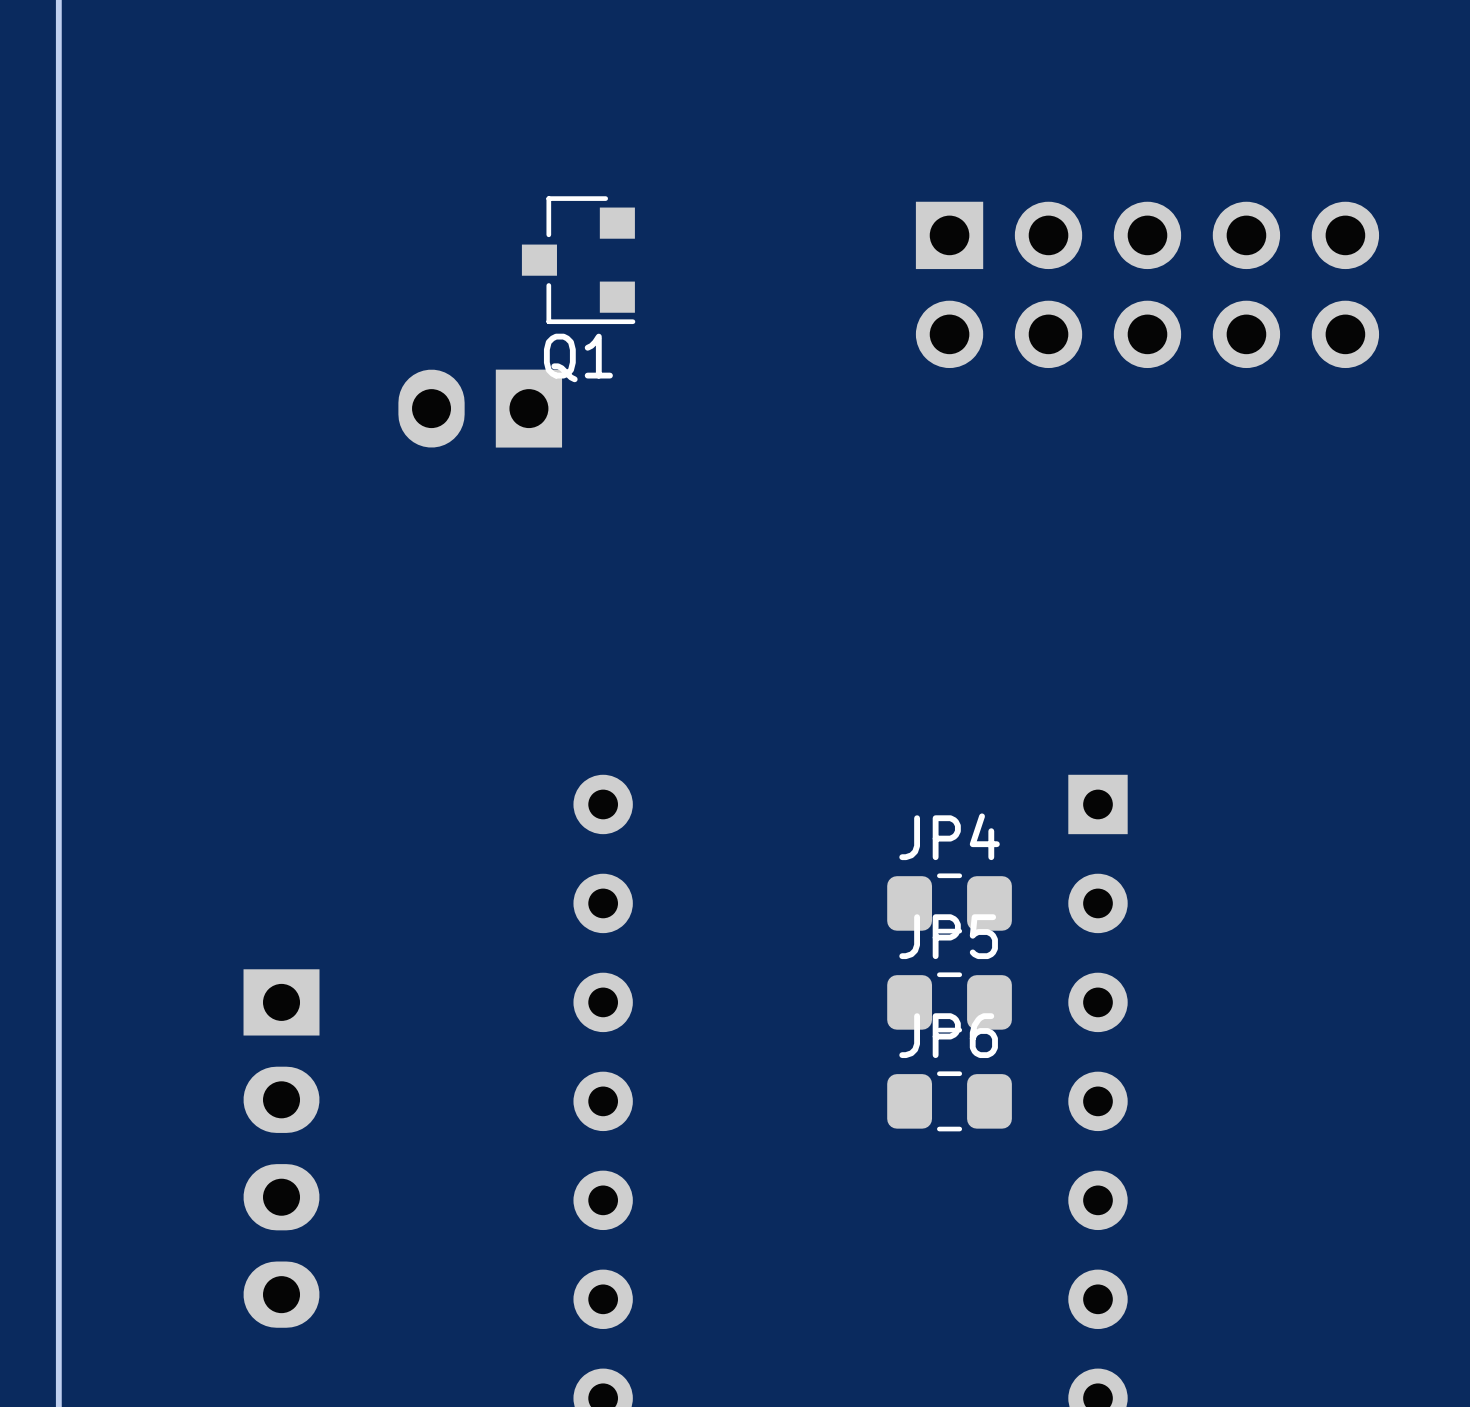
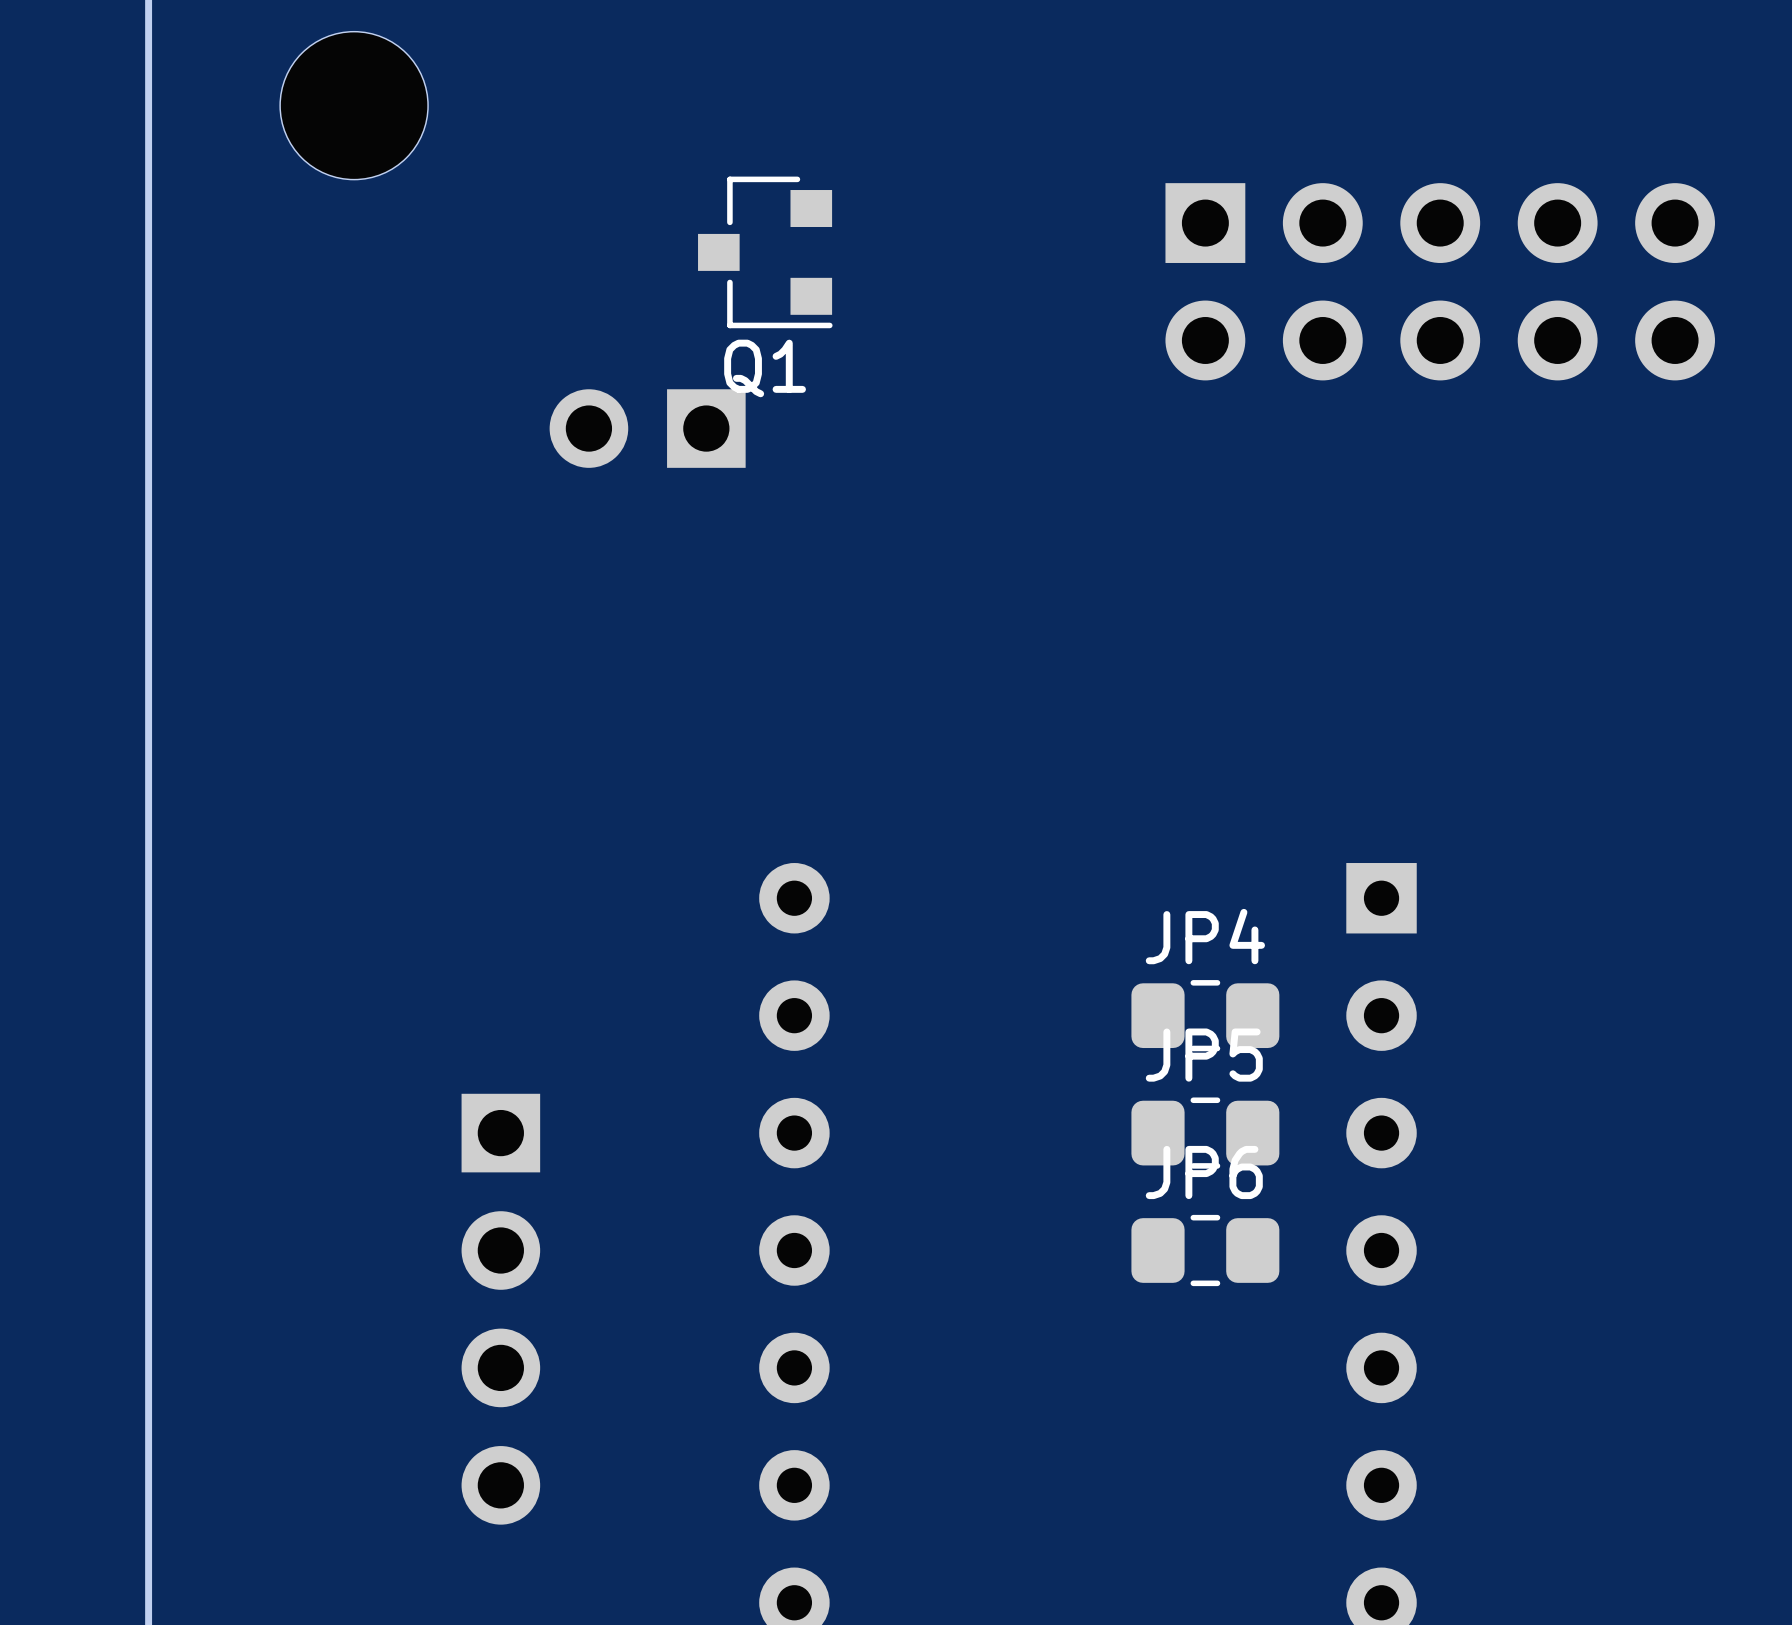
part: none -> (354, 105)
part footprint: [398, 369, 563, 448] -> [549, 389, 746, 468]
part: (281, 1148) -> none
part: none -> (500, 1309)

